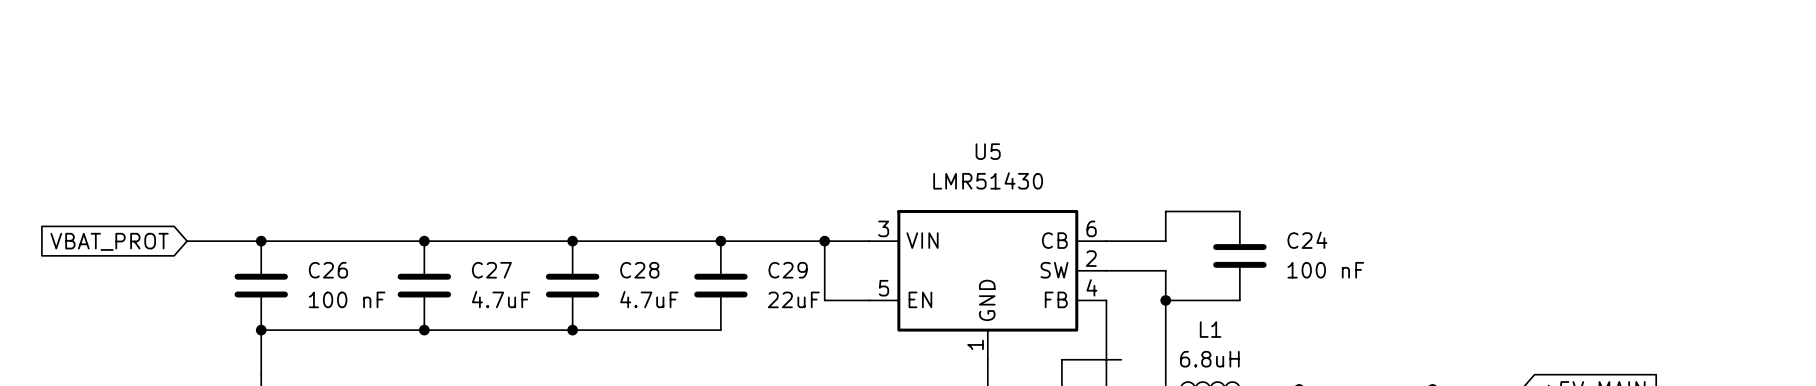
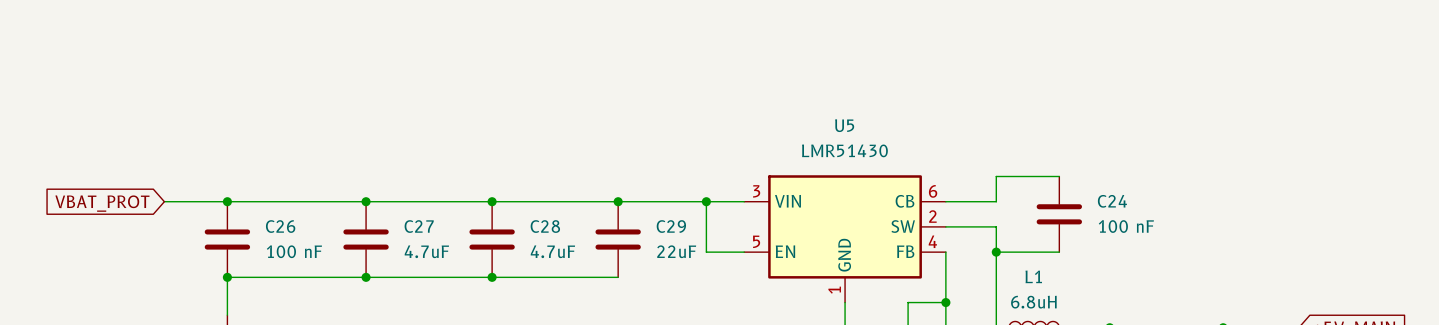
wire: (1106, 359) (1121, 359) -> none
junction: none -> (945, 302)

